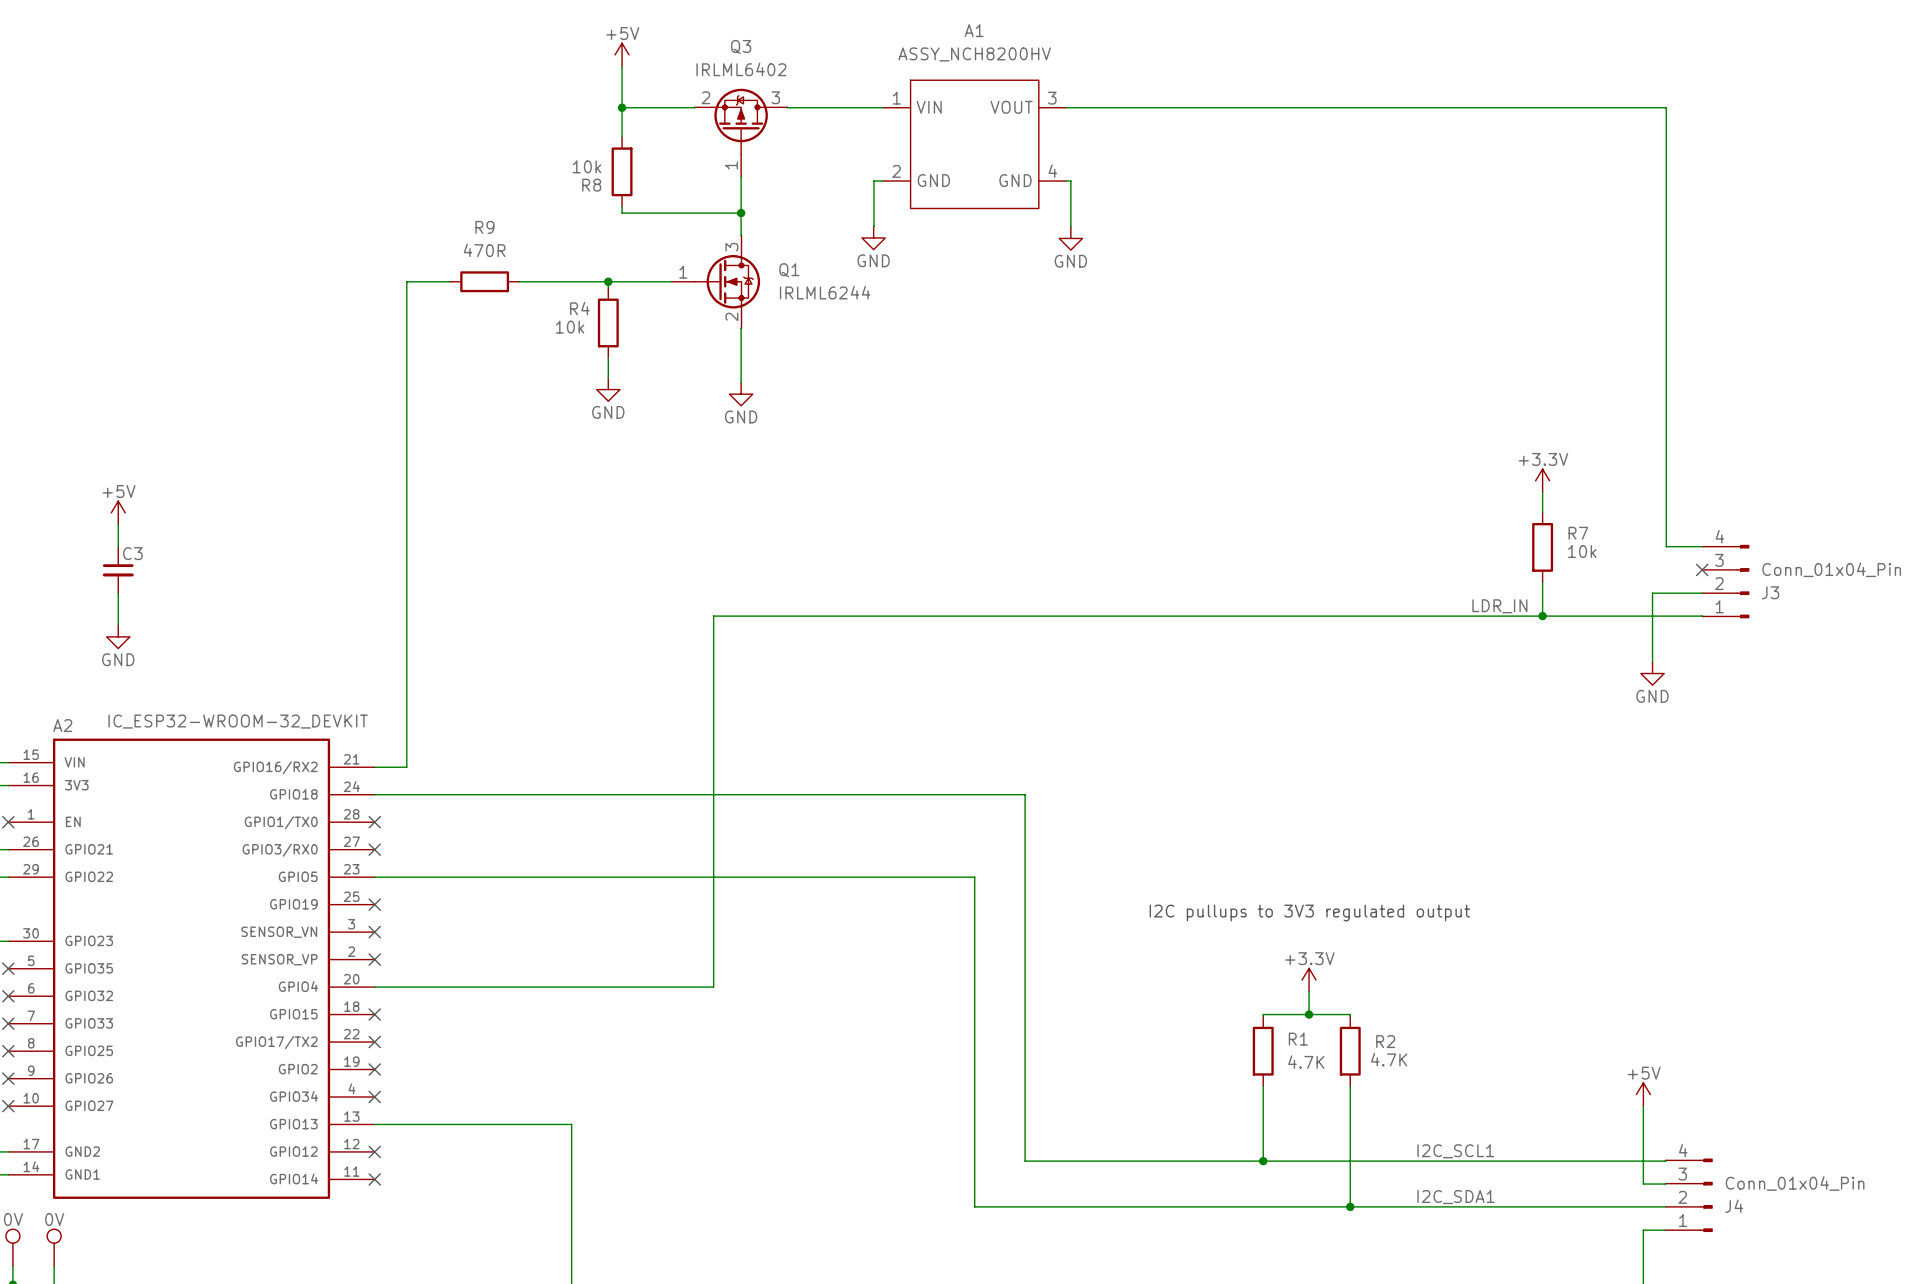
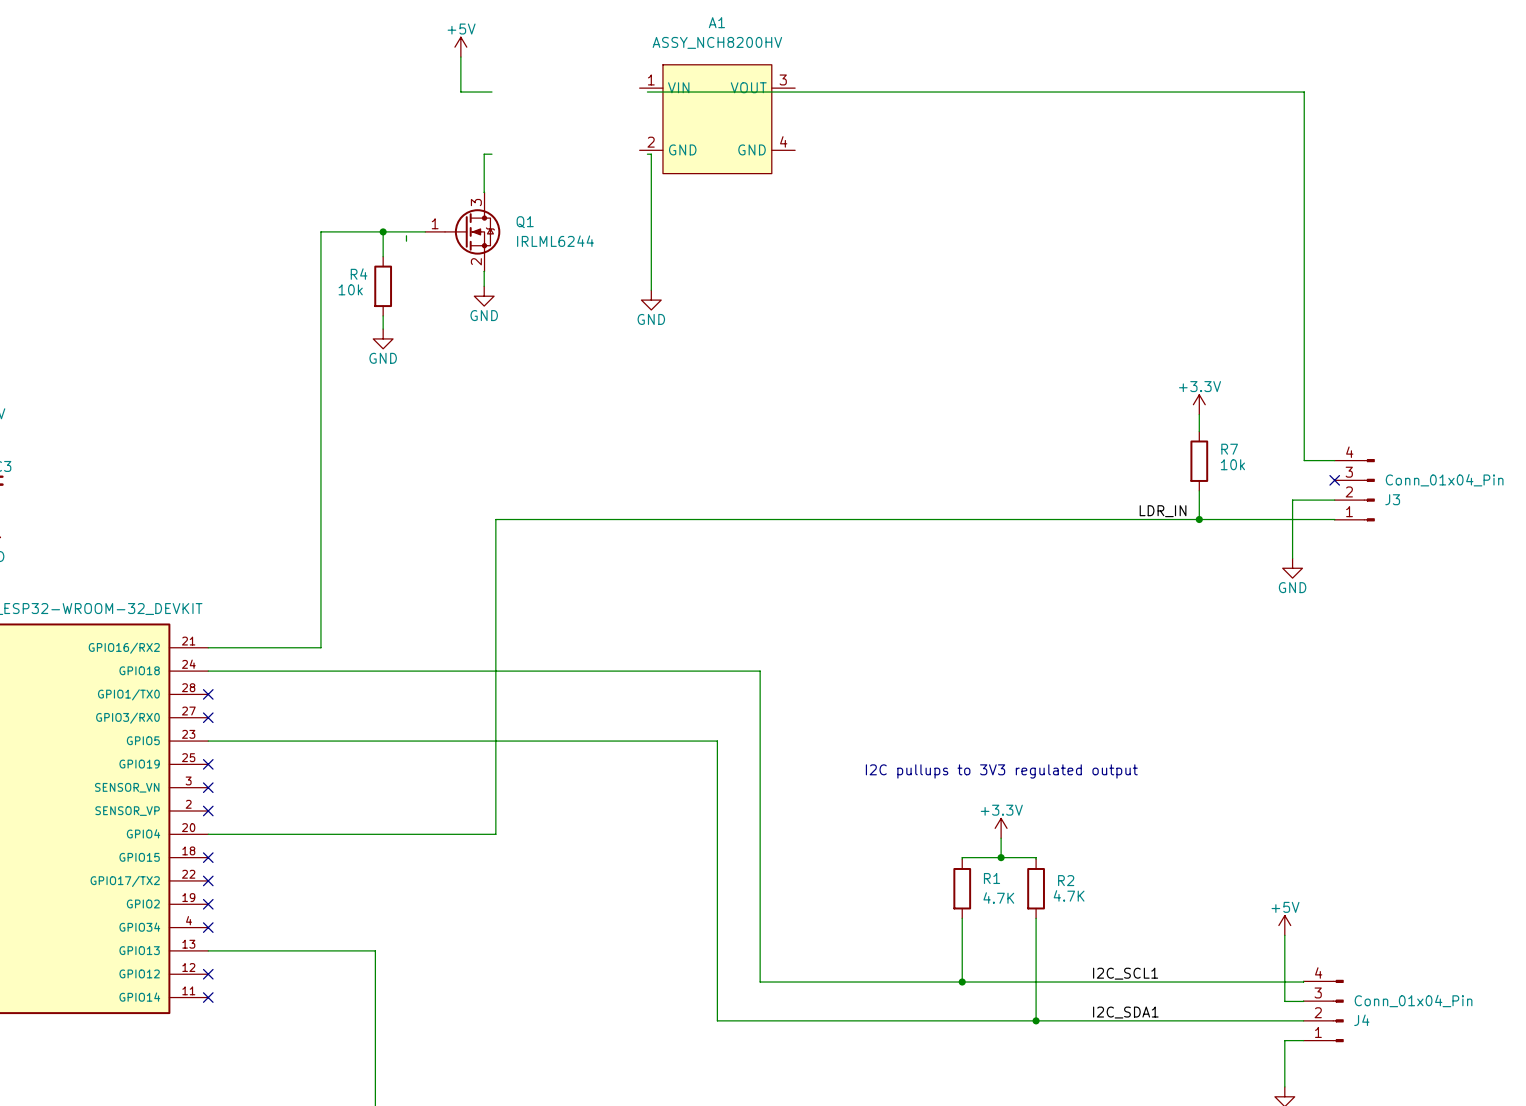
power symbol position: +5V (622, 54) -> +5V (460, 47)
wire: (622, 66) (622, 136) -> none
wire: none -> (460, 57) (460, 92) (491, 92)
junction: (622, 107) -> none
wire: (694, 107) (622, 107) -> none
wire: (787, 107) (883, 107) -> none
wire: (1066, 107) (1666, 107) (1666, 112) -> (647, 92) (1304, 92)
Q3: IRLML6402 (741, 132) -> none
R8: 10k (622, 171) -> none
wire: (741, 177) (741, 235) -> none
wire: (883, 181) (873, 181) (873, 226) -> none
wire: (1066, 181) (1070, 181) (1070, 226) -> none
wire: none -> (491, 154) (484, 154) (484, 192)
wire: none -> (647, 154) (651, 154) (651, 290)
wire: (622, 206) (622, 213) (741, 213) -> none
junction: (741, 213) -> none
power symbol: GND (873, 237) -> none
power symbol: GND (1070, 238) -> none
wire: none -> (383, 231) (383, 256)
wire: (449, 281) (406, 281) (406, 767) -> (425, 231) (320, 231) (320, 647) (235, 647)
R9: 470R (484, 281) -> none
wire: (519, 281) (671, 281) -> none
junction position: (608, 281) -> (383, 231)
Q1 position: (715, 281) -> (462, 231)
R4 position: (608, 322) -> (383, 286)
wire: none -> (484, 271) (484, 286)
wire: (741, 328) (741, 382) -> none
power symbol: none -> GND (484, 296)
wire: (608, 357) (608, 377) -> none
power symbol: none -> GND (651, 300)
wire: none -> (383, 315) (383, 329)
power symbol position: GND (608, 389) -> GND (383, 338)
power symbol: GND (741, 394) -> none

